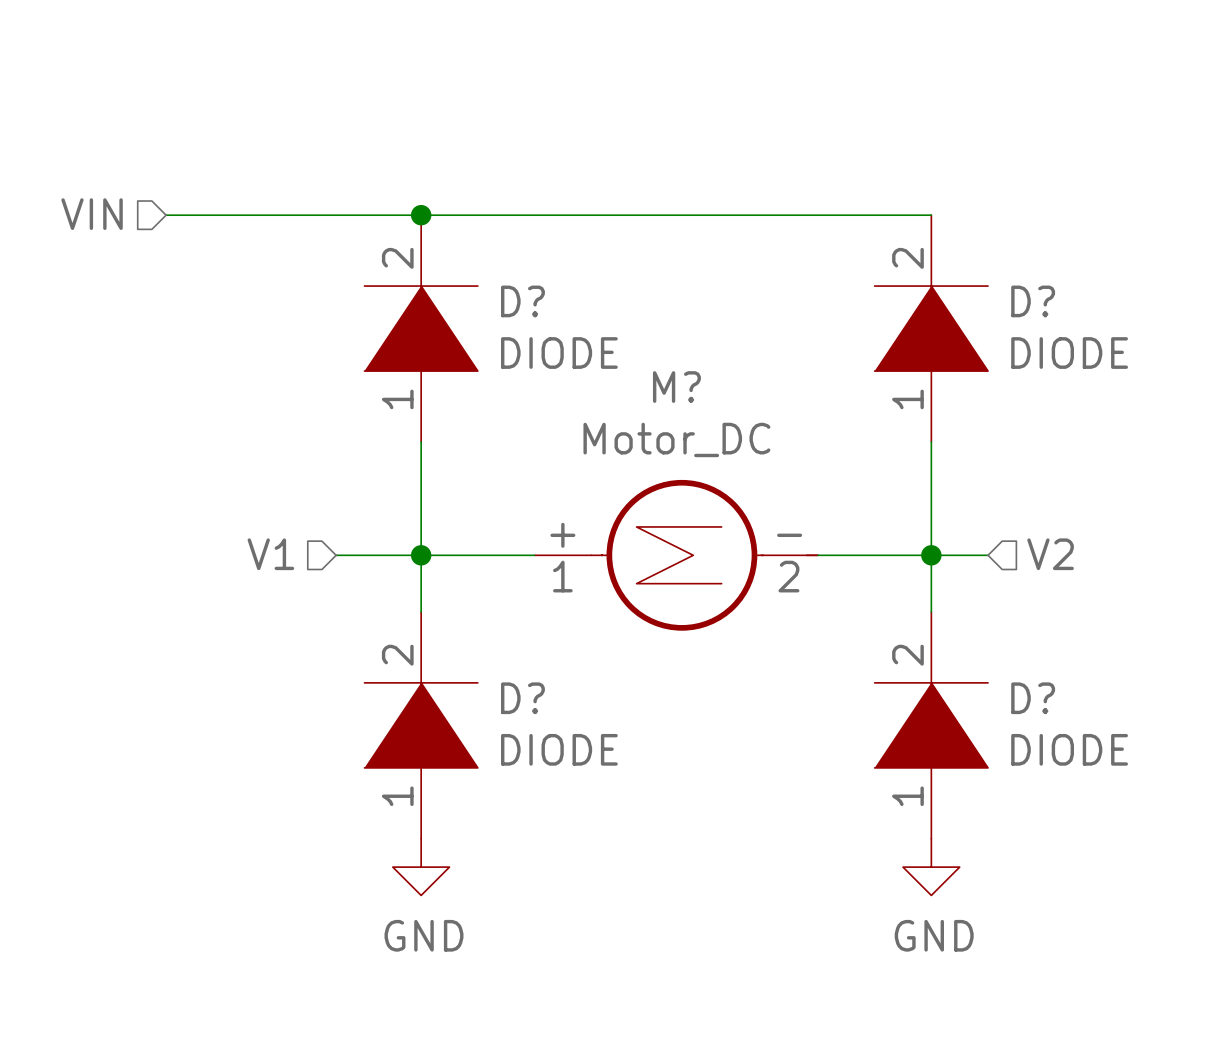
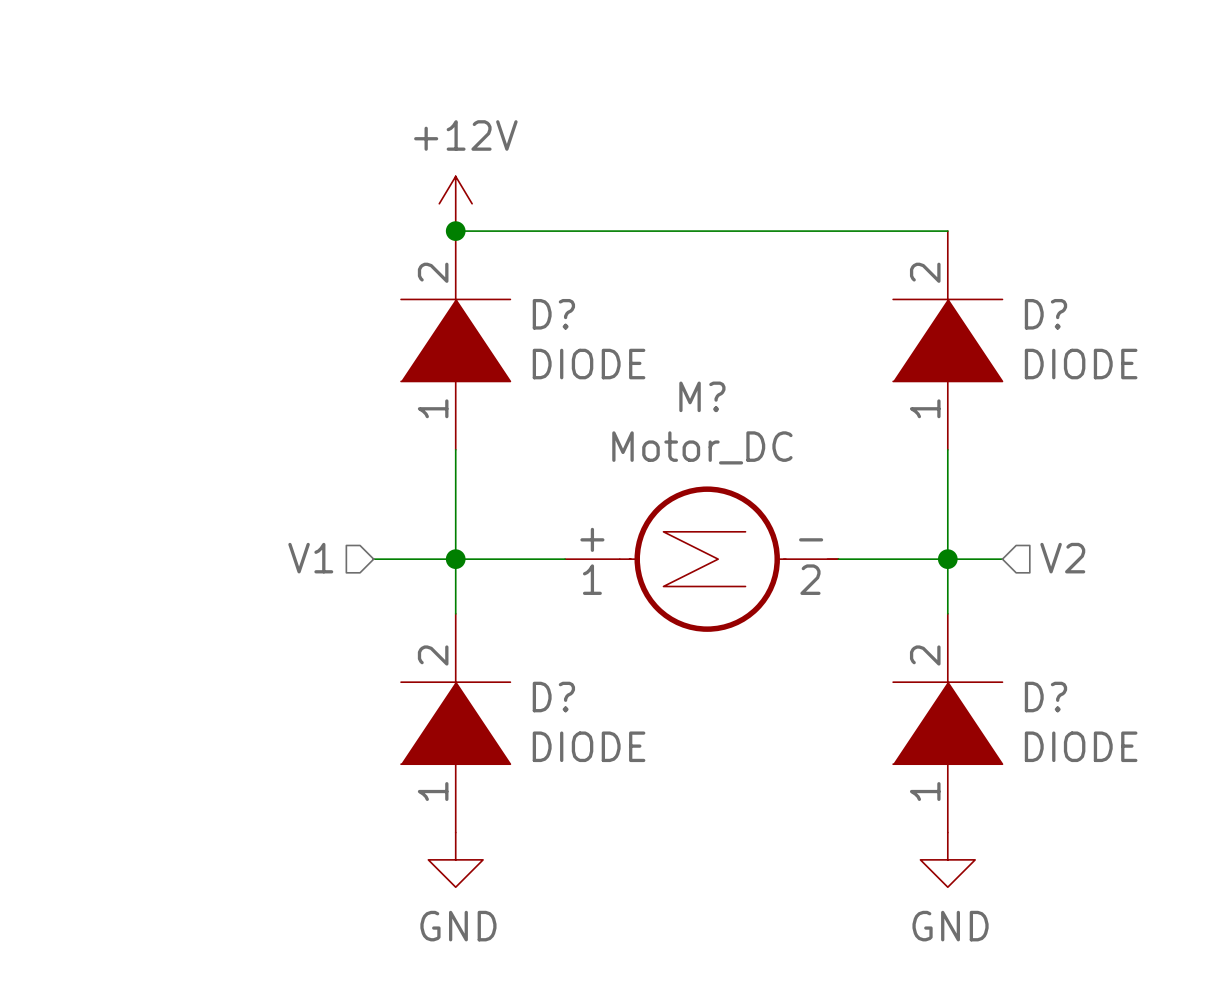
power symbol: none -> +12V (455, 203)
hierarchical label: VIN (92, 214) -> none
wire: (166, 215) (421, 215) -> none

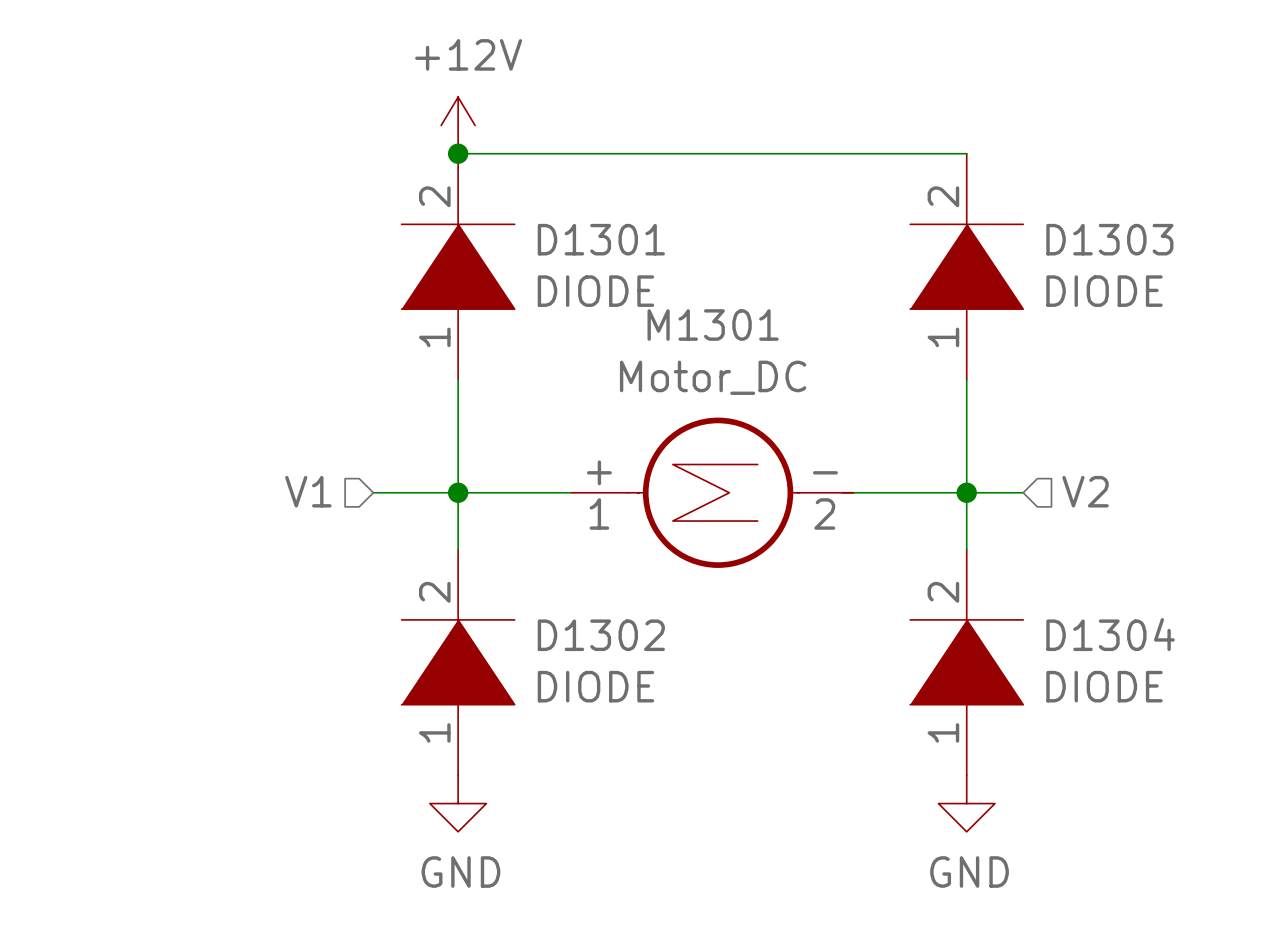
D? name: D? (553, 314) -> D1301 (601, 239)
D? name: D? (1045, 314) -> D1303 (1109, 239)
M? name: M? (702, 396) -> M1301 (713, 325)
D? name: D? (553, 697) -> D1302 (601, 635)
D? name: D? (1045, 697) -> D1304 (1110, 634)

